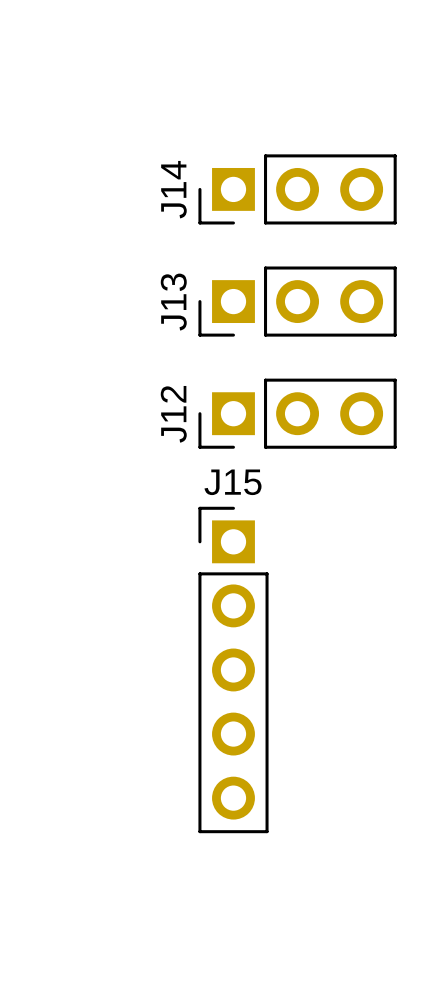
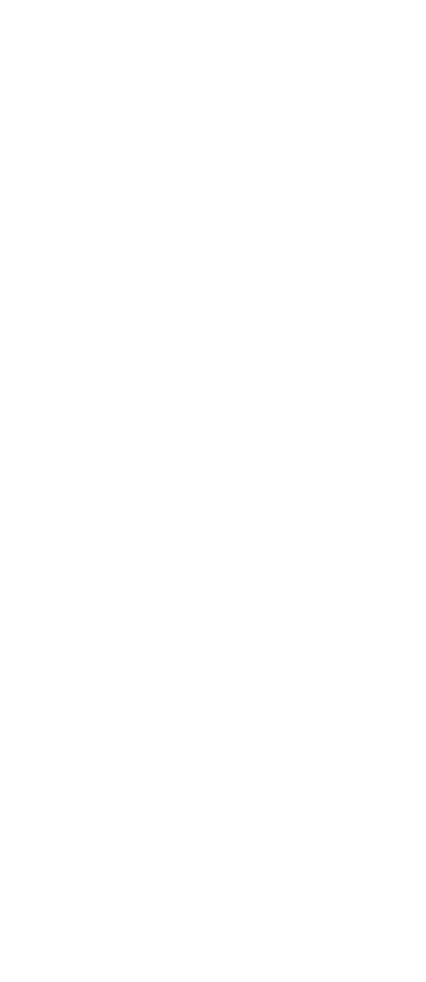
J14: (297, 189) -> none
J13: (297, 301) -> none
J12: (297, 413) -> none
J15: (233, 669) -> none

